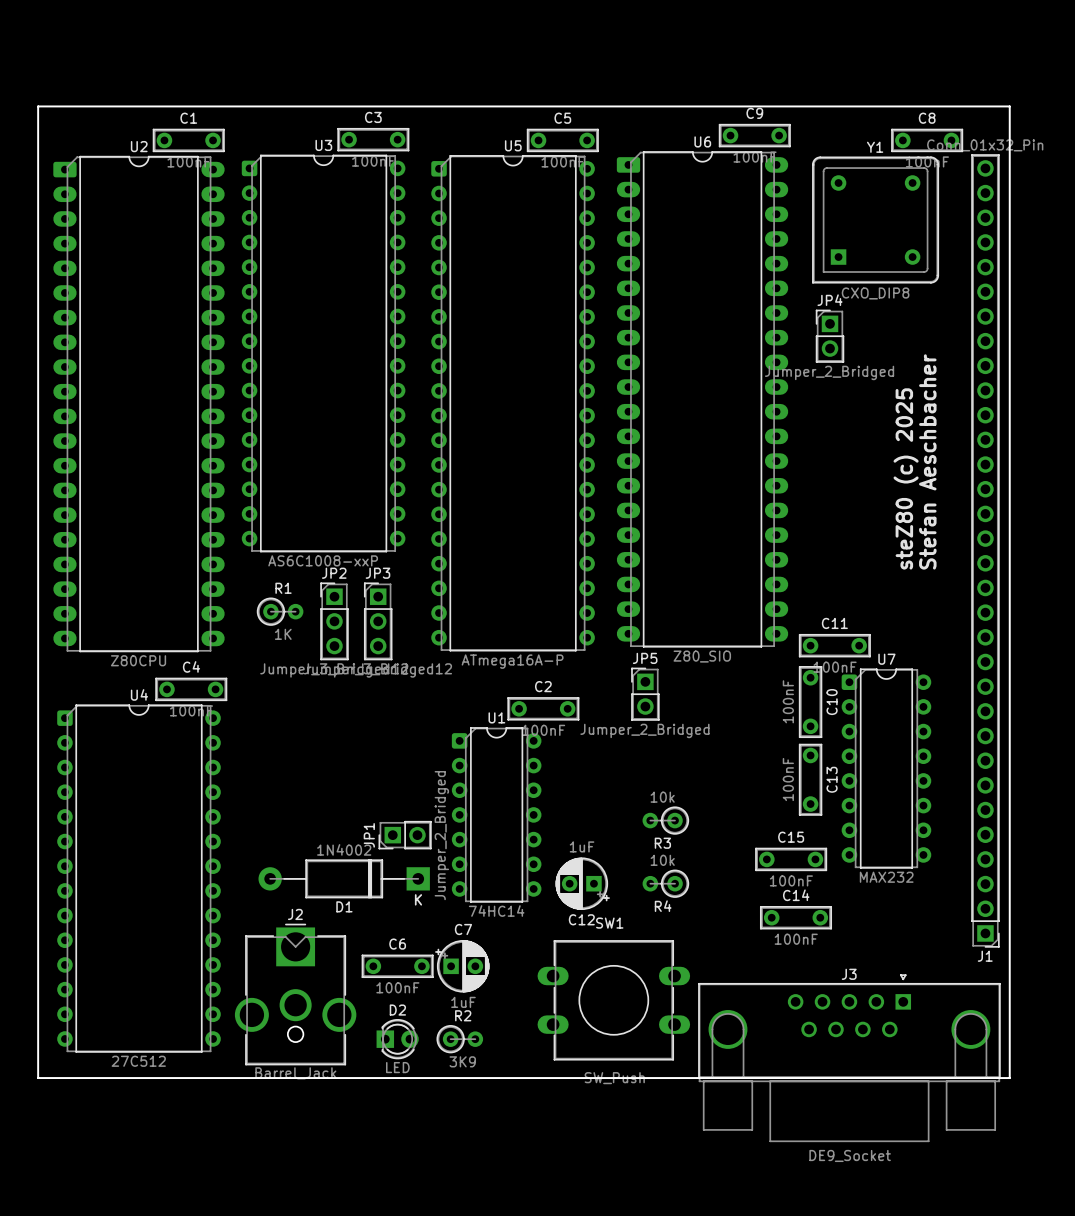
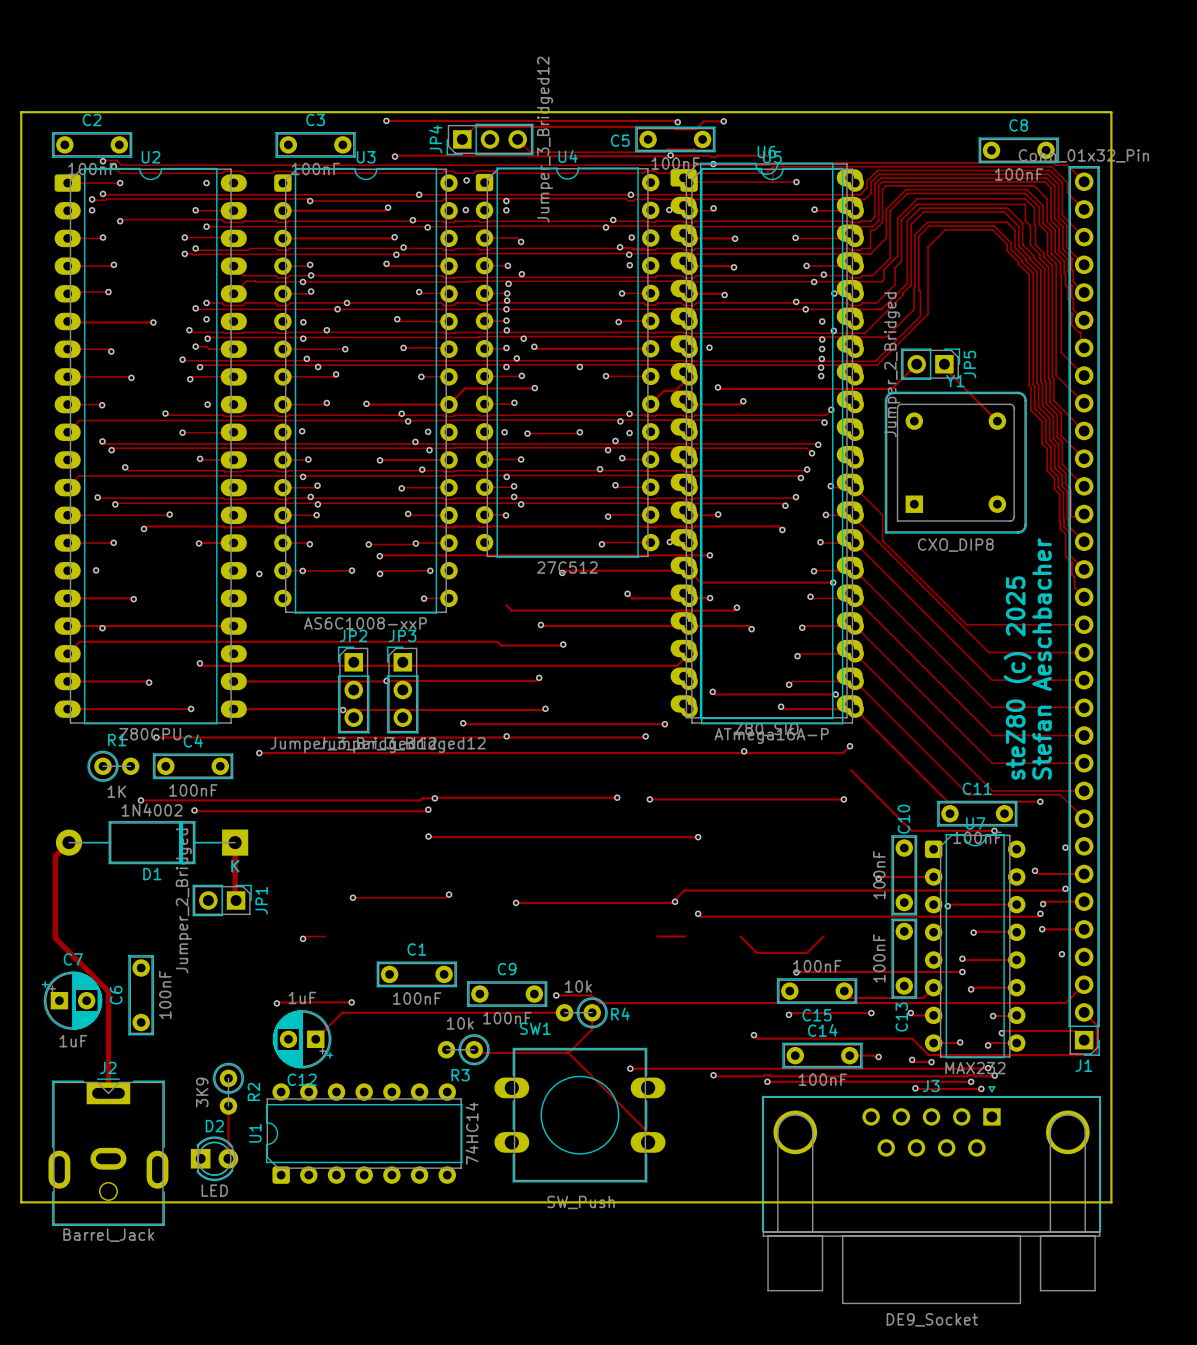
track: none -> (386, 120) (677, 122)
via: none -> (386, 120)
track: none -> (723, 121) (703, 121) (695, 129) (675, 129) (673, 126) (474, 126) (462, 139)
via: none -> (723, 121)
via: none -> (677, 122)
C5 name position: C5 (562, 118) -> C5 (620, 140)
track: none -> (517, 139) (530, 152) (664, 152) (668, 149) (713, 150)
C9 position: (754, 135) -> (507, 994)
C3 position: (373, 139) -> (315, 144)
C1 position: (188, 140) -> (416, 974)
C5 position: (562, 140) -> (675, 139)
via: none -> (670, 155)
track: none -> (394, 156) (767, 156)
via: none -> (394, 156)
track: none -> (103, 161) (116, 160) (121, 165) (769, 165) (771, 162) (1053, 162) (1055, 165) (1067, 165) (1084, 181)
via: none -> (103, 161)
via: none -> (713, 164)
track: none -> (113, 166) (120, 173) (222, 173) (224, 171) (243, 171) (244, 173) (272, 173) (274, 171) (291, 171) (293, 173) (442, 173) (444, 171) (453, 171) (455, 173) (473, 173) (476, 170) (493, 170) (495, 173) (643, 173) (645, 170) (655, 170) (657, 173) (766, 173) (773, 166) (1051, 166) (1067, 183) (1067, 193) (1084, 209)
via: none -> (113, 166)
track: none -> (773, 166) (773, 182)
via: none -> (466, 180)
track: none -> (796, 182) (689, 183)
via: none -> (796, 182)
track: none -> (67, 183) (120, 183)
via: none -> (120, 183)
via: none -> (206, 183)
track: none -> (103, 193) (680, 194)
via: none -> (103, 193)
via: none -> (419, 194)
via: none -> (630, 194)
track: none -> (680, 194) (860, 194) (866, 187) (866, 181) (877, 170) (1049, 170) (1062, 183) (1062, 215) (1084, 237)
track: none -> (92, 199) (309, 199) (311, 201) (442, 201) (444, 198) (625, 198) (628, 201) (645, 198) (865, 199) (871, 193) (871, 182) (879, 174) (1048, 174) (1058, 184) (1058, 216) (1066, 225) (1066, 247) (1084, 264)
via: none -> (92, 199)
via: none -> (310, 201)
via: none -> (506, 201)
track: none -> (388, 207) (385, 210) (282, 210)
via: none -> (388, 207)
track: none -> (713, 208) (711, 210) (689, 210)
via: none -> (713, 208)
via: none -> (92, 210)
track: none -> (195, 210) (233, 210)
via: none -> (195, 210)
via: none -> (465, 210)
via: none -> (506, 210)
via: none -> (669, 209)
track: none -> (814, 209) (855, 210)
via: none -> (814, 209)
via: none -> (412, 220)
via: none -> (613, 219)
track: none -> (120, 221) (121, 219) (221, 219) (224, 222) (860, 222) (870, 221) (874, 216) (874, 184) (880, 178) (1046, 178) (1054, 186) (1054, 218) (1062, 226) (1062, 248) (1072, 258) (1073, 281) (1084, 292)
via: none -> (120, 221)
via: none -> (206, 226)
track: none -> (209, 227) (872, 226) (878, 220) (878, 185) (882, 182) (1045, 182) (1050, 187) (1050, 220) (1059, 228) (1059, 250) (1068, 259) (1069, 283) (1072, 286) (1073, 309) (1084, 320)
via: none -> (427, 227)
via: none -> (606, 227)
track: none -> (394, 237) (282, 238)
via: none -> (394, 237)
track: none -> (103, 237) (67, 238)
via: none -> (103, 237)
track: none -> (184, 237) (233, 238)
via: none -> (184, 237)
track: none -> (484, 237) (517, 237) (521, 241)
via: none -> (631, 237)
track: none -> (689, 238) (735, 238)
track: none -> (795, 237) (855, 238)
via: none -> (795, 237)
via: none -> (735, 238)
Y1 position: (875, 220) -> (955, 462)
via: none -> (521, 241)
track: none -> (620, 247) (631, 247) (633, 249) (848, 248) (860, 250) (870, 248) (870, 230) (874, 230) (882, 222) (882, 189) (886, 185) (1034, 185) (1047, 198) (1047, 221) (1055, 229) (1055, 252) (1064, 261) (1069, 310) (1072, 314) (1071, 325) (1080, 332) (1080, 344) (1084, 347)
via: none -> (620, 247)
track: none -> (195, 248) (197, 250) (248, 250) (250, 248) (276, 248) (278, 250) (289, 248) (645, 249)
via: none -> (195, 248)
via: none -> (403, 247)
track: none -> (184, 253) (870, 253) (886, 238) (886, 209) (905, 189) (1026, 189) (1043, 205) (1043, 223) (1051, 231) (1051, 253) (1060, 262) (1061, 352) (1084, 375)
via: none -> (184, 253)
via: none -> (396, 254)
via: none -> (629, 254)
track: none -> (386, 263) (388, 266) (449, 266)
via: none -> (386, 263)
track: none -> (113, 264) (67, 266)
via: none -> (113, 264)
track: none -> (310, 264) (282, 266)
via: none -> (310, 264)
via: none -> (629, 265)
track: none -> (233, 266) (243, 275) (275, 275) (278, 277) (287, 277) (289, 275) (442, 275) (444, 277) (848, 275) (850, 277) (860, 277) (862, 275) (872, 275) (890, 258) (890, 210) (907, 193) (1025, 193) (1039, 207) (1039, 224) (1047, 233) (1047, 255) (1056, 263) (1056, 375) (1084, 403)
track: none -> (484, 265) (507, 265)
via: none -> (507, 265)
track: none -> (689, 266) (734, 267)
track: none -> (806, 265) (855, 266)
via: none -> (806, 265)
via: none -> (734, 267)
via: none -> (521, 274)
via: none -> (311, 275)
via: none -> (823, 274)
via: none -> (302, 281)
via: none -> (814, 281)
via: none -> (508, 283)
track: none -> (108, 292) (69, 292) (67, 293)
via: none -> (108, 292)
track: none -> (311, 291) (308, 293) (282, 293)
via: none -> (311, 291)
track: none -> (419, 292) (449, 293)
via: none -> (419, 292)
track: none -> (484, 293) (507, 293)
track: none -> (622, 293) (650, 293)
track: none -> (233, 293) (246, 281) (881, 281) (884, 279) (884, 269) (897, 256) (897, 218) (917, 198) (1025, 198) (1034, 207) (1035, 244) (1052, 265) (1053, 400) (1084, 430)
via: none -> (507, 293)
via: none -> (622, 293)
track: none -> (689, 293) (724, 295)
via: none -> (834, 293)
via: none -> (724, 295)
via: none -> (507, 300)
via: none -> (796, 301)
track: none -> (206, 302) (222, 302) (224, 305) (243, 305) (245, 302) (275, 302) (278, 305) (287, 305) (290, 302) (441, 302) (444, 305) (453, 305) (456, 302) (477, 302) (479, 305) (489, 305) (491, 302) (643, 302) (645, 305) (681, 302) (684, 305) (693, 305) (696, 302) (847, 302) (850, 305) (860, 305) (862, 302) (876, 302) (895, 284) (895, 267) (901, 261) (901, 220) (917, 204) (1025, 204) (1025, 220) (1030, 225) (1030, 245) (1048, 267) (1050, 402) (1061, 413) (1061, 435) (1084, 458)
via: none -> (206, 302)
via: none -> (346, 302)
track: none -> (195, 308) (468, 309)
via: none -> (195, 308)
via: none -> (337, 309)
track: none -> (468, 309) (682, 309)
via: none -> (506, 309)
track: none -> (682, 309) (881, 309) (907, 283) (907, 221) (920, 208) (1007, 208) (1022, 223) (1022, 244) (1044, 268) (1046, 403) (1057, 414) (1057, 437) (1062, 442) (1062, 464) (1084, 486)
via: none -> (805, 309)
track: none -> (397, 319) (399, 321) (449, 321)
via: none -> (397, 319)
via: none -> (206, 319)
track: none -> (67, 321) (68, 316) (74, 322) (153, 322)
track: none -> (506, 320) (484, 321)
via: none -> (506, 320)
track: none -> (650, 321) (618, 322)
via: none -> (822, 321)
via: none -> (153, 322)
via: none -> (303, 322)
via: none -> (618, 322)
track: none -> (189, 330) (191, 332) (224, 333) (864, 333) (911, 285) (911, 224) (923, 212) (1004, 212) (1018, 226) (1018, 246) (1040, 270) (1042, 405) (1053, 416) (1053, 438) (1058, 443) (1058, 466) (1065, 473) (1065, 484) (1071, 489) (1071, 516) (1081, 516) (1084, 514)
via: none -> (189, 330)
via: none -> (326, 330)
via: none -> (506, 330)
JP4 name position: JP4 (830, 300) -> JP4 (435, 139)
via: none -> (833, 330)
track: none -> (615, 336) (207, 338)
track: none -> (615, 336) (886, 337) (914, 309) (914, 234) (927, 222) (1007, 222) (1014, 230) (1014, 247) (1037, 271) (1038, 406) (1049, 418) (1049, 440) (1054, 445) (1054, 467) (1062, 475) (1062, 486) (1067, 491) (1067, 525) (1084, 541)
via: none -> (207, 338)
via: none -> (303, 338)
via: none -> (523, 338)
via: none -> (822, 339)
JP4 footprint: [816, 309, 844, 363] -> [446, 123, 534, 156]
track: none -> (195, 346) (206, 346) (209, 349) (233, 349)
via: none -> (195, 346)
track: none -> (534, 346) (536, 348) (650, 348)
via: none -> (534, 346)
track: none -> (403, 347) (449, 349)
via: none -> (403, 347)
track: none -> (506, 347) (484, 348)
via: none -> (506, 347)
via: none -> (709, 347)
track: none -> (67, 349) (108, 349) (111, 351)
track: none -> (282, 349) (345, 349)
via: none -> (345, 349)
via: none -> (822, 349)
via: none -> (111, 351)
via: none -> (516, 358)
track: none -> (182, 359) (875, 361) (920, 316) (918, 236) (928, 226) (994, 226) (1011, 242) (1011, 249) (1033, 273) (1034, 408) (1045, 419) (1045, 441) (1050, 447) (1050, 469) (1058, 476) (1058, 487) (1063, 492) (1064, 527) (1069, 532) (1069, 554) (1084, 569)
via: none -> (182, 359)
via: none -> (306, 358)
via: none -> (821, 358)
track: none -> (916, 364) (892, 388) (717, 387)
track: none -> (944, 364) (944, 368) (997, 421)
track: none -> (200, 367) (202, 365) (876, 365) (928, 314) (928, 247) (945, 229) (992, 229) (1007, 244) (1007, 250) (1029, 274) (1030, 410) (1042, 421) (1042, 443) (1047, 448) (1047, 470) (1054, 478) (1054, 489) (1059, 494) (1060, 528) (1065, 534) (1065, 556) (1072, 563) (1071, 574) (1074, 577) (1074, 587) (1084, 597)
via: none -> (200, 367)
via: none -> (318, 367)
via: none -> (506, 367)
via: none -> (579, 367)
via: none -> (821, 367)
track: none -> (336, 374) (333, 376) (282, 376)
via: none -> (336, 374)
track: none -> (521, 375) (484, 376)
via: none -> (521, 375)
track: none -> (606, 376) (650, 376)
via: none -> (606, 376)
via: none -> (821, 376)
track: none -> (67, 376) (131, 377)
track: none -> (233, 376) (192, 376) (190, 379)
track: none -> (421, 376) (449, 376)
via: none -> (421, 376)
track: none -> (689, 376) (675, 390) (664, 390) (650, 404)
via: none -> (131, 377)
via: none -> (190, 379)
via: none -> (717, 387)
track: none -> (534, 388) (465, 388) (449, 404) (366, 403)
via: none -> (534, 388)
U3 position: (323, 353) -> (365, 390)
track: none -> (743, 401) (739, 404) (689, 404)
via: none -> (743, 401)
track: none -> (326, 403) (282, 404)
via: none -> (326, 403)
track: none -> (514, 402) (484, 404)
via: none -> (514, 402)
via: none -> (366, 403)
track: none -> (67, 404) (102, 405)
via: none -> (102, 405)
via: none -> (207, 404)
track: none -> (831, 409) (826, 415) (693, 416) (224, 416) (167, 415) (165, 413)
via: none -> (831, 409)
JP4 value: Jumper_2_Bridged (829, 372) -> Jumper_3_Bridged12 (545, 139)
via: none -> (165, 413)
via: none -> (401, 413)
via: none -> (629, 413)
track: none -> (665, 420) (79, 420) (67, 432)
track: none -> (665, 420) (822, 420) (824, 422)
via: none -> (408, 421)
via: none -> (620, 421)
via: none -> (824, 422)
via: none -> (302, 431)
track: none -> (233, 432) (182, 432)
via: none -> (428, 431)
via: none -> (504, 432)
track: none -> (579, 432) (527, 433)
via: none -> (579, 432)
via: none -> (182, 432)
via: none -> (527, 433)
via: none -> (629, 433)
track: none -> (102, 441) (104, 443) (224, 443)
via: none -> (102, 441)
via: none -> (615, 440)
via: none -> (415, 441)
track: none -> (224, 443) (243, 443)
track: none -> (243, 443) (277, 443)
track: none -> (278, 443) (287, 443)
track: none -> (287, 443) (444, 443)
track: none -> (444, 443) (453, 443)
track: none -> (453, 443) (684, 443)
track: none -> (684, 443) (693, 443)
track: none -> (694, 443) (818, 444)
via: none -> (818, 444)
U5 position: (513, 403) -> (772, 446)
U2 position: (139, 404) -> (150, 446)
track: none -> (111, 450) (113, 448) (806, 448) (812, 453)
via: none -> (111, 450)
via: none -> (429, 450)
via: none -> (608, 450)
via: none -> (812, 453)
track: none -> (622, 458) (650, 459)
via: none -> (622, 458)
track: none -> (200, 458) (233, 459)
via: none -> (200, 458)
track: none -> (308, 459) (282, 459)
via: none -> (308, 459)
track: none -> (484, 459) (521, 459)
via: none -> (521, 459)
via: none -> (380, 460)
track: none -> (449, 459) (380, 460)
track: none -> (125, 467) (128, 470) (224, 471) (693, 471) (807, 469)
via: none -> (125, 467)
via: none -> (600, 469)
via: none -> (807, 469)
via: none -> (422, 469)
via: none -> (303, 476)
via: none -> (506, 476)
track: none -> (800, 477) (798, 475) (655, 475) (79, 475) (67, 487)
via: none -> (800, 477)
track: none -> (615, 485) (617, 487) (650, 487)
via: none -> (615, 485)
track: none -> (317, 485) (315, 487) (282, 487)
via: none -> (317, 485)
track: none -> (514, 486) (484, 487)
via: none -> (514, 486)
track: none -> (830, 486) (855, 487) (882, 515) (882, 540) (966, 624) (1084, 624)
via: none -> (830, 486)
via: none -> (401, 488)
track: none -> (449, 487) (401, 488)
via: none -> (97, 497)
via: none -> (310, 496)
via: none -> (514, 496)
track: none -> (795, 497) (693, 499) (224, 499) (97, 497)
via: none -> (795, 497)
track: none -> (455, 503) (669, 503)
track: none -> (455, 503) (115, 504)
track: none -> (669, 503) (783, 503) (785, 505)
via: none -> (115, 504)
via: none -> (317, 504)
via: none -> (521, 504)
via: none -> (785, 505)
text position: Stefan Aeschbacher (927, 461) -> Stefan Aeschbacher (1042, 659)
track: none -> (408, 513) (449, 515)
via: none -> (408, 513)
track: none -> (718, 514) (689, 515)
via: none -> (718, 514)
track: none -> (169, 514) (67, 515)
via: none -> (169, 514)
track: none -> (316, 515) (282, 515)
via: none -> (316, 515)
track: none -> (484, 514) (506, 515)
via: none -> (506, 515)
track: none -> (650, 514) (609, 514) (608, 516)
track: none -> (825, 514) (855, 515) (855, 518) (988, 652) (1084, 652)
via: none -> (825, 514)
via: none -> (608, 516)
track: none -> (144, 528) (146, 526) (778, 526) (782, 529)
via: none -> (144, 528)
via: none -> (782, 529)
text position: steZ80 (c) 2025 (906, 478) -> steZ80 (c) 2025 (1017, 678)
via: none -> (669, 542)
track: none -> (820, 542) (855, 543) (992, 680) (1084, 680)
via: none -> (820, 542)
track: none -> (113, 542) (67, 543)
via: none -> (113, 542)
via: none -> (199, 543)
track: none -> (233, 543) (199, 543)
track: none -> (282, 543) (309, 544)
via: none -> (415, 543)
track: none -> (449, 543) (368, 544)
track: none -> (650, 542) (603, 542) (601, 544)
via: none -> (309, 544)
via: none -> (368, 544)
via: none -> (601, 544)
track: none -> (709, 555) (379, 556)
via: none -> (709, 555)
via: none -> (379, 556)
via: none -> (96, 570)
track: none -> (352, 570) (282, 570)
via: none -> (352, 570)
via: none -> (302, 570)
track: none -> (430, 570) (383, 570) (380, 573)
via: none -> (430, 570)
track: none -> (814, 571) (855, 570) (991, 707) (1084, 707)
via: none -> (814, 571)
via: none -> (380, 573)
track: none -> (562, 572) (564, 570) (689, 570) (700, 582) (833, 582)
via: none -> (562, 572)
via: none -> (259, 573)
via: none -> (833, 582)
track: none -> (627, 593) (632, 598) (710, 598)
via: none -> (627, 593)
track: none -> (810, 596) (812, 598) (855, 598) (992, 735) (1084, 735)
via: none -> (810, 596)
track: none -> (67, 598) (133, 599)
via: none -> (424, 598)
track: none -> (449, 598) (424, 598)
via: none -> (710, 598)
via: none -> (133, 599)
track: none -> (506, 605) (511, 610) (734, 610) (736, 607)
via: none -> (736, 607)
track: none -> (540, 625) (748, 626) (751, 629)
via: none -> (540, 625)
track: none -> (67, 626) (233, 626)
track: none -> (802, 627) (803, 626) (855, 626) (992, 763) (1084, 763)
via: none -> (802, 627)
via: none -> (102, 628)
via: none -> (751, 629)
track: none -> (563, 644) (501, 645) (497, 641) (79, 641) (67, 653)
via: none -> (563, 644)
track: none -> (689, 653) (677, 665) (202, 665) (199, 663)
track: none -> (797, 656) (799, 653) (855, 653) (992, 790) (1084, 790)
via: none -> (797, 656)
via: none -> (199, 663)
track: none -> (539, 677) (536, 680) (233, 681)
via: none -> (539, 677)
R1 position: (280, 611) -> (113, 766)
track: none -> (67, 681) (149, 682)
via: none -> (386, 680)
via: none -> (149, 682)
track: none -> (789, 684) (792, 681) (855, 681) (968, 794) (1060, 794) (1084, 818)
via: none -> (789, 684)
track: none -> (712, 691) (715, 694) (835, 694)
via: none -> (712, 691)
via: none -> (835, 694)
track: none -> (781, 706) (783, 709) (855, 709) (947, 801) (1040, 801)
via: none -> (781, 706)
track: none -> (191, 708) (67, 709)
via: none -> (191, 708)
track: none -> (545, 708) (233, 709)
via: none -> (545, 708)
via: none -> (343, 710)
C11 position: (834, 645) -> (977, 813)
track: none -> (463, 723) (664, 724)
via: none -> (463, 723)
via: none -> (664, 724)
via: none -> (506, 736)
track: none -> (645, 736) (156, 737)
via: none -> (645, 736)
via: none -> (156, 737)
track: none -> (849, 746) (843, 753) (259, 753)
via: none -> (849, 746)
via: none -> (744, 751)
via: none -> (259, 753)
track: none -> (851, 770) (911, 830) (994, 830)
JP5 rotation: 0° (645, 694) -> 90° clockwise (930, 364)
JP5 position: (645, 694) -> (930, 364)
C10 position: (810, 702) -> (904, 875)
C10 name position: C10 (832, 702) -> C10 (903, 819)
C2 position: (543, 708) -> (92, 144)
via: none -> (434, 798)
track: none -> (617, 797) (435, 797) (422, 798) (420, 800) (140, 800)
via: none -> (617, 797)
track: none -> (649, 799) (843, 799)
via: none -> (649, 799)
via: none -> (843, 799)
via: none -> (140, 800)
via: none -> (1040, 801)
via: none -> (194, 810)
track: none -> (428, 809) (426, 811) (194, 810)
via: none -> (428, 809)
via: none -> (994, 830)
track: none -> (428, 836) (698, 837)
via: none -> (428, 836)
via: none -> (698, 837)
track: none -> (68, 842) (55, 856) (55, 938) (108, 991) (108, 1093)
track: none -> (235, 842) (236, 900)
via: none -> (1065, 847)
U7 position: (886, 768) -> (975, 946)
C13 position: (810, 779) -> (904, 958)
C13 name position: C13 (832, 779) -> C13 (901, 1017)
track: none -> (1034, 870) (1038, 874) (1084, 874)
via: none -> (1034, 870)
track: none -> (933, 876) (880, 876) (878, 878)
via: none -> (878, 878)
track: none -> (1065, 888) (1063, 890) (684, 890) (673, 902) (516, 902)
via: none -> (1065, 888)
track: none -> (449, 894) (445, 897) (352, 897)
via: none -> (449, 894)
via: none -> (352, 897)
via: none -> (675, 901)
track: none -> (1084, 901) (1045, 901) (1043, 904)
via: none -> (516, 902)
track: none -> (1016, 904) (949, 904) (947, 906)
via: none -> (1043, 904)
U1 rotation: 0° (496, 814) -> 90° counterclockwise (364, 1133)
U1 position: (496, 814) -> (364, 1133)
via: none -> (947, 906)
track: none -> (698, 913) (700, 916) (1037, 916) (1040, 913)
via: none -> (698, 913)
R3 position: (665, 820) -> (463, 1049)
via: none -> (1040, 913)
track: none -> (1042, 929) (1084, 929)
via: none -> (1042, 929)
JP1 rotation: 0° (405, 835) -> 180° (222, 900)
JP1 position: (405, 835) -> (222, 900)
C15 name position: C15 (791, 837) -> C15 (817, 1015)
via: none -> (973, 932)
track: none -> (1016, 932) (1020, 931) (973, 932)
track: none -> (325, 936) (305, 936) (303, 938)
track: none -> (657, 936) (685, 936)
track: none -> (740, 936) (756, 952) (807, 952) (823, 936)
via: none -> (303, 938)
via: none -> (1061, 954)
C15 position: (791, 859) -> (817, 991)
track: none -> (962, 958) (1016, 960)
via: none -> (962, 958)
via: none -> (962, 972)
via: none -> (796, 972)
U4 position: (139, 878) -> (567, 362)
D1 position: (344, 878) -> (152, 842)
C15 value position: 100nF (791, 880) -> 100nF (817, 966)
C12 position: (582, 883) -> (303, 1039)
R4 position: (665, 883) -> (581, 1012)
track: none -> (1084, 984) (1065, 1003) (599, 1003) (591, 995) (556, 995)
track: none -> (933, 987) (923, 997) (851, 997) (844, 991)
track: none -> (1016, 987) (972, 987) (971, 989)
via: none -> (971, 989)
via: none -> (556, 995)
track: none -> (351, 1002) (276, 1003)
via: none -> (351, 1002)
via: none -> (276, 1003)
R4 name position: R4 (663, 906) -> R4 (620, 1013)
track: none -> (1084, 1012) (1096, 1025) (1096, 1052) (1094, 1055) (928, 1055) (912, 1038) (757, 1038) (753, 1035)
track: none -> (564, 1012) (342, 1012) (315, 1039)
track: none -> (592, 1012) (592, 1029) (568, 1052) (472, 1052) (474, 1049)
track: none -> (871, 1013) (790, 1013) (788, 1014)
via: none -> (871, 1013)
track: none -> (910, 1013) (913, 1015) (933, 1015)
via: none -> (910, 1013)
via: none -> (788, 1014)
via: none -> (993, 1016)
track: none -> (1016, 1015) (993, 1016)
C14 position: (796, 917) -> (822, 1055)
J2 footprint: [234, 923, 357, 1066] -> [48, 1078, 169, 1227]
SW1 name position: SW1 (609, 923) -> SW1 (535, 1028)
track: none -> (1001, 1033) (1004, 1030) (1075, 1030) (1084, 1040)
via: none -> (1001, 1033)
via: none -> (753, 1035)
track: none -> (960, 1042) (933, 1043)
via: none -> (960, 1042)
track: none -> (988, 1045) (990, 1043) (1016, 1043) (1018, 1046)
via: none -> (988, 1045)
track: none -> (567, 1051) (648, 1132) (648, 1142)
C6 name position: C6 (397, 944) -> C6 (116, 995)
track: none -> (849, 1055) (878, 1056)
via: none -> (878, 1056)
track: none -> (912, 1059) (914, 1062) (931, 1062)
via: none -> (912, 1059)
via: none -> (931, 1062)
via: none -> (630, 1068)
track: none -> (988, 1068) (630, 1068)
via: none -> (988, 1068)
track: none -> (713, 1075) (994, 1075)
via: none -> (713, 1075)
via: none -> (994, 1075)
C6 rotation: 0° (397, 966) -> 90° clockwise (141, 995)
C6 position: (397, 966) -> (141, 995)
C7 position: (462, 966) -> (72, 1000)
track: none -> (767, 1081) (971, 1081)
via: none -> (767, 1081)
via: none -> (971, 1081)
J3 footprint: [698, 974, 1001, 1142] -> [762, 1086, 1102, 1304]
track: none -> (915, 1088) (981, 1088)
via: none -> (915, 1088)
via: none -> (981, 1088)
C6 value position: 100nF (397, 987) -> 100nF (165, 994)
track: none -> (228, 1106) (228, 1157)
SW1 position: (613, 1000) -> (579, 1115)
D2 position: (397, 1039) -> (214, 1158)
R2 rotation: 0° (459, 1039) -> 90° clockwise (228, 1088)
R2 position: (459, 1039) -> (228, 1088)

